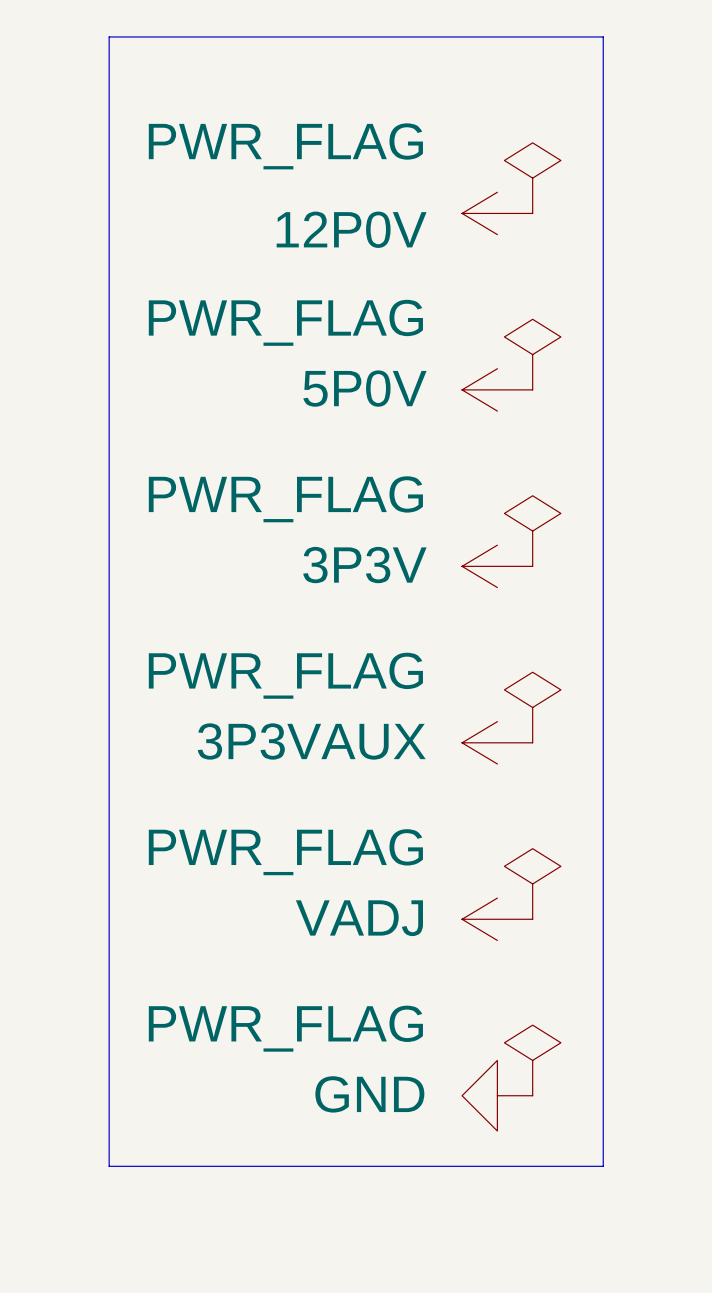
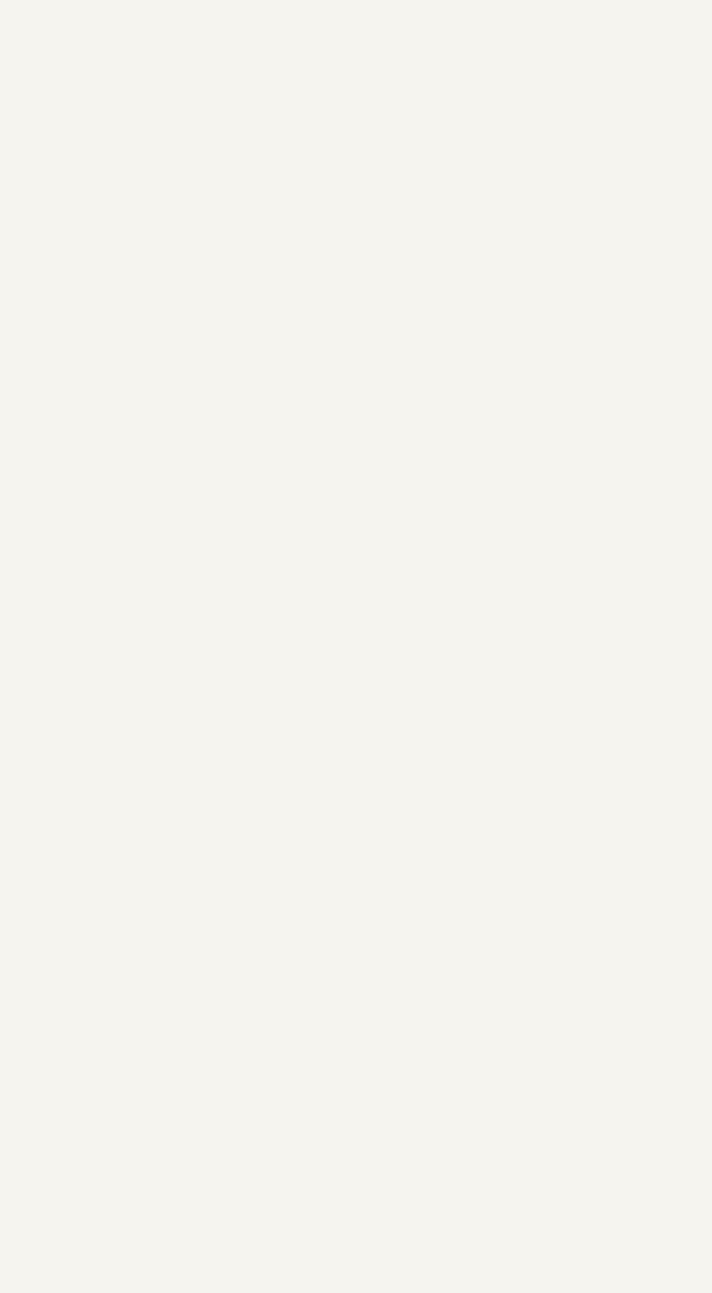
line: (109, 36) (109, 1166) (603, 1166) (603, 36) (109, 36) -> none
power symbol: PWR_FLAG (532, 178) -> none
power symbol: 12P0V (497, 213) -> none
power symbol: PWR_FLAG (532, 354) -> none
power symbol: 5P0V (497, 389) -> none
power symbol: PWR_FLAG (532, 531) -> none
power symbol: 3P3V (497, 566) -> none
power symbol: PWR_FLAG (532, 707) -> none
power symbol: 3P3VAUX (497, 742) -> none
power symbol: PWR_FLAG (532, 883) -> none
power symbol: VADJ (497, 919) -> none
power symbol: PWR_FLAG (532, 1060) -> none
power symbol: GND (497, 1095) -> none

